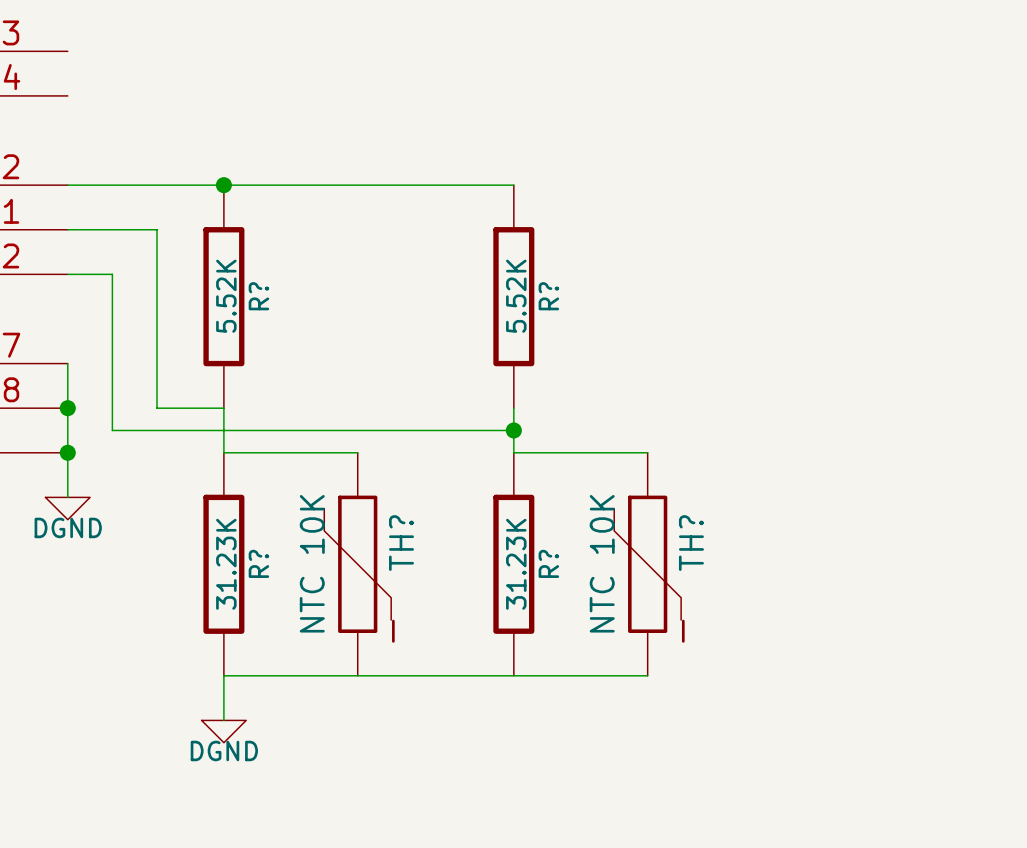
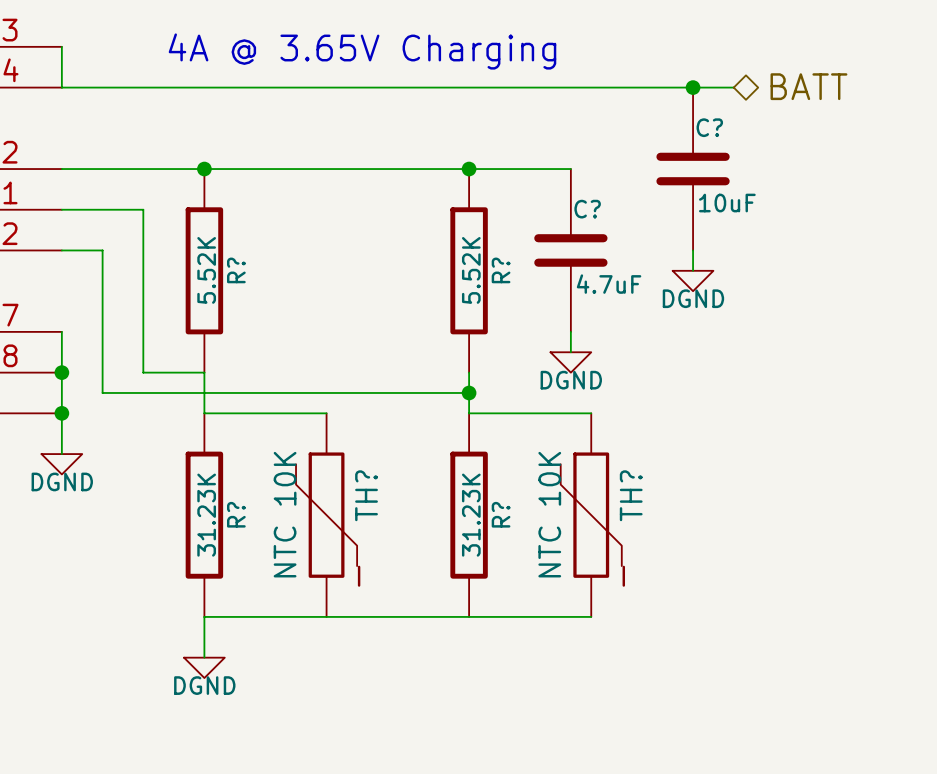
wire: none -> (61, 46) (61, 87) (733, 87)
text: none -> 4A @ 3.65V Charging (362, 51)
hierarchical label: none -> BATT (808, 86)
junction: none -> (693, 87)
wire: none -> (469, 169) (570, 169)
junction: none -> (469, 169)
C?: none -> 10uF (693, 169)
C?: none -> 4.7uF (570, 250)
wire: none -> (693, 250) (693, 270)
power symbol: none -> DGND (693, 281)
wire: none -> (570, 331) (570, 352)
power symbol: none -> DGND (570, 362)

